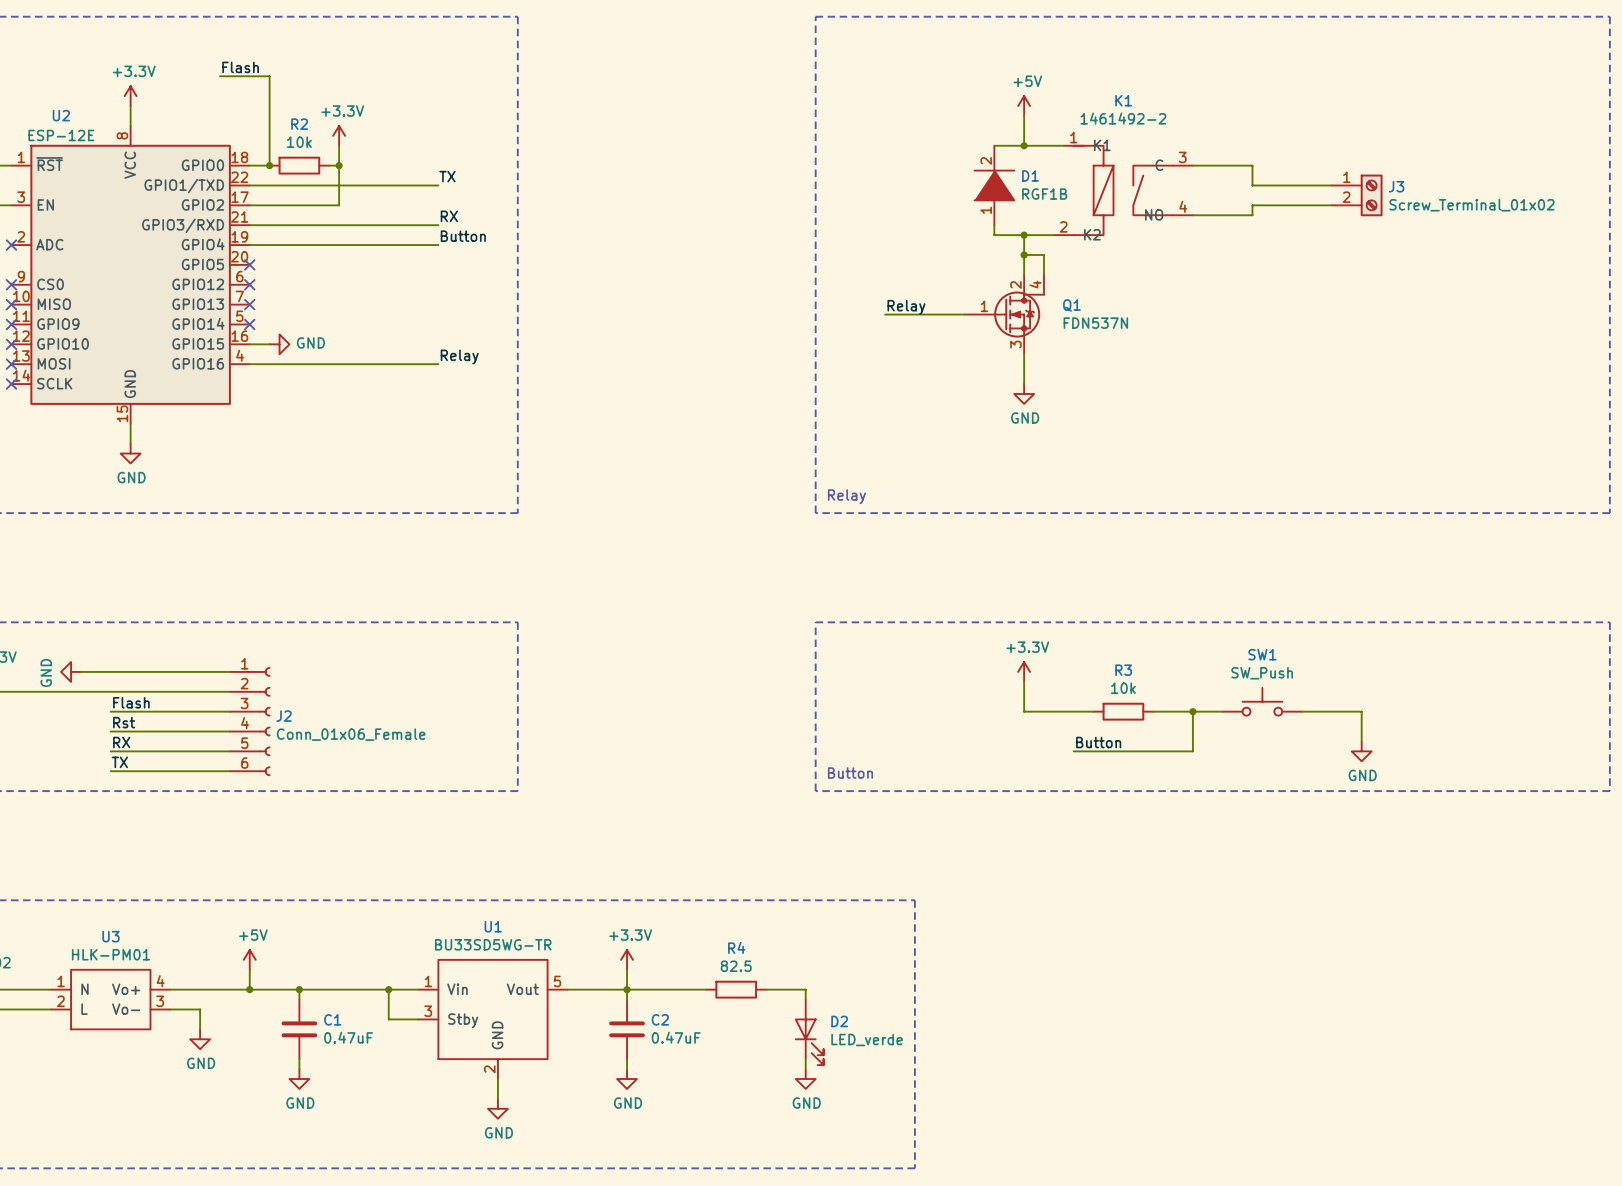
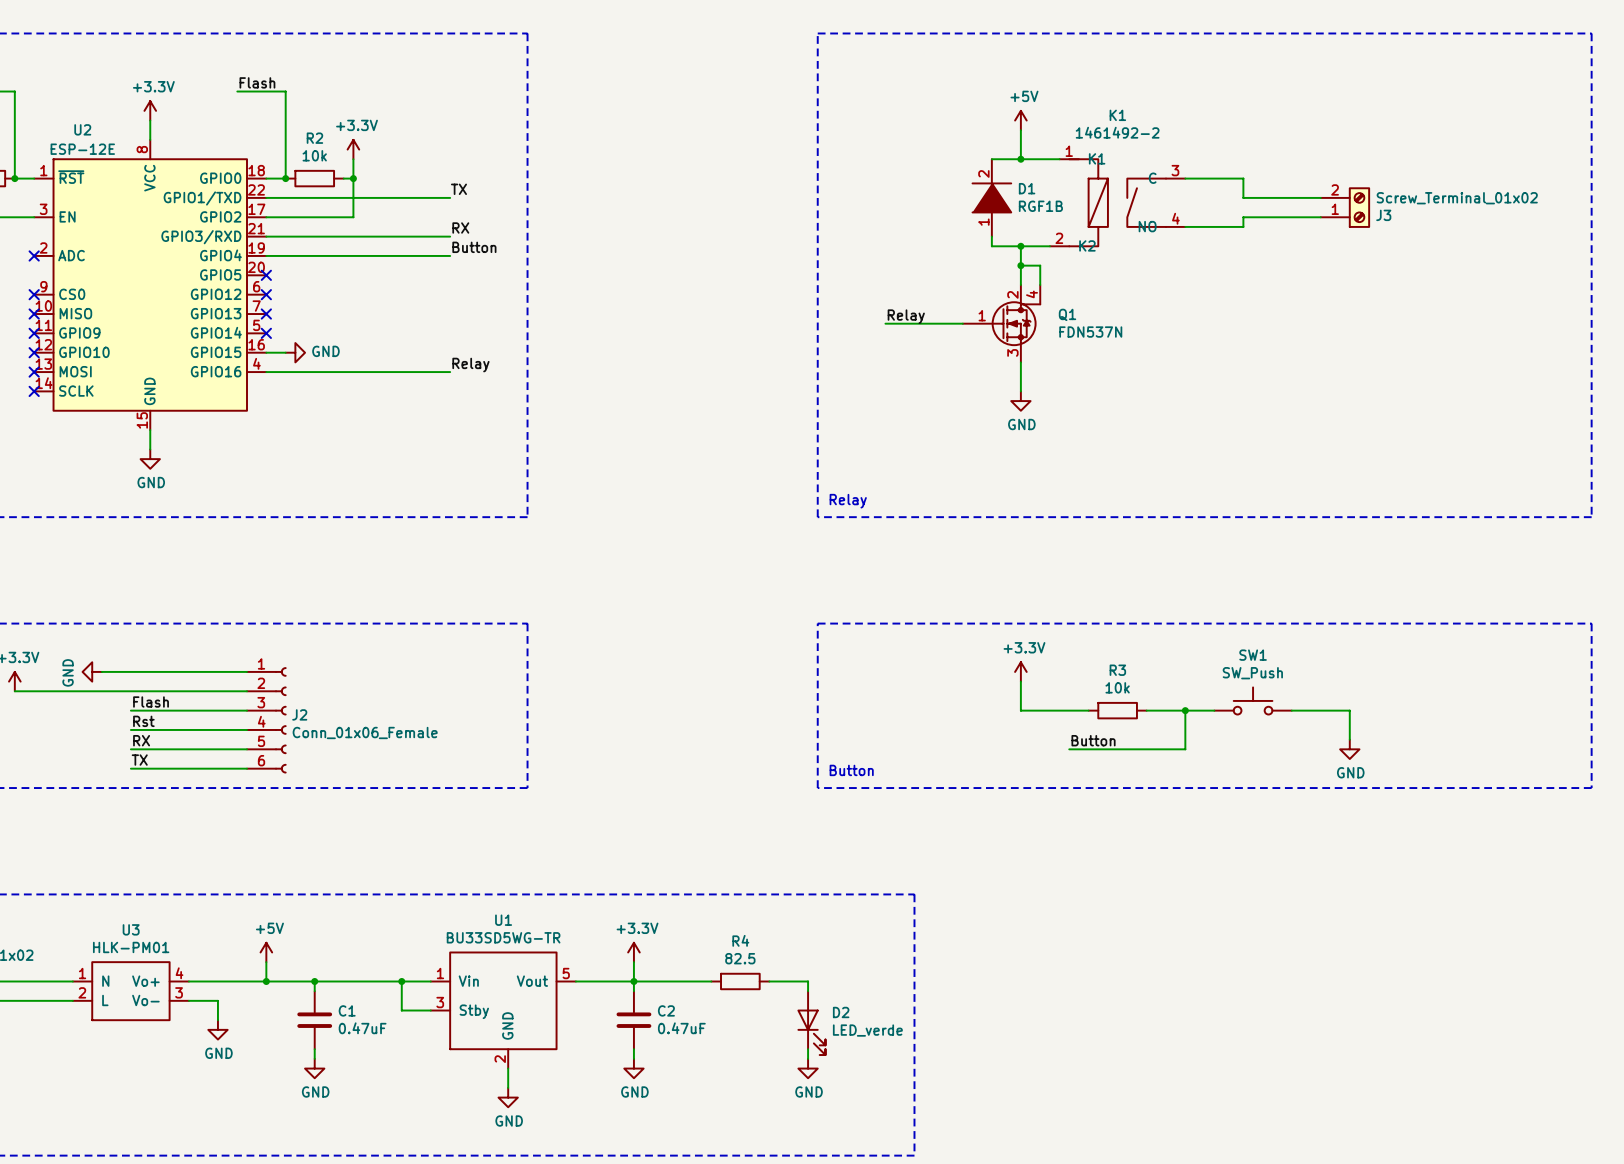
J3 flip: as is (1371, 195) -> up-down (1359, 207)

